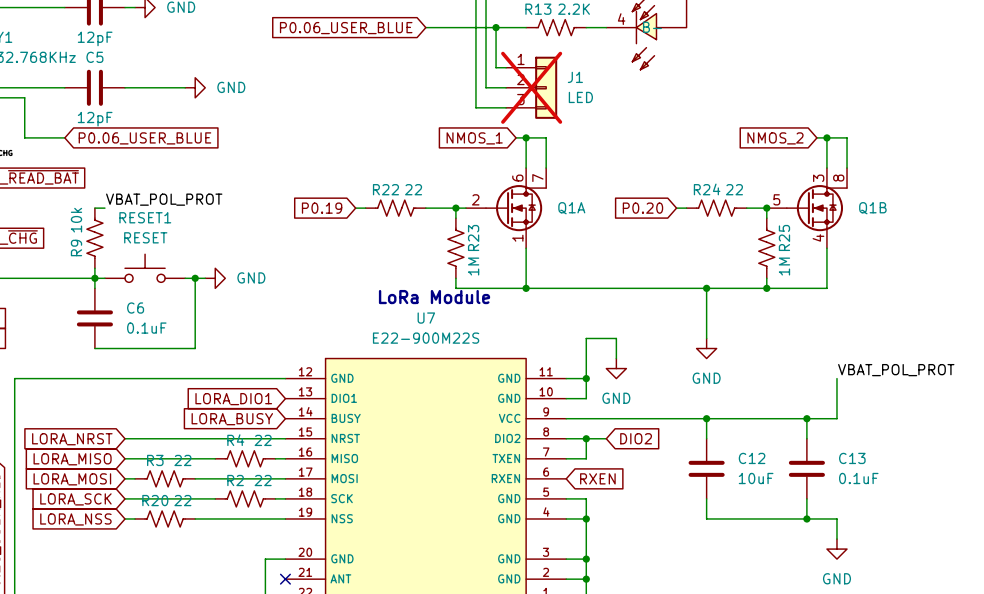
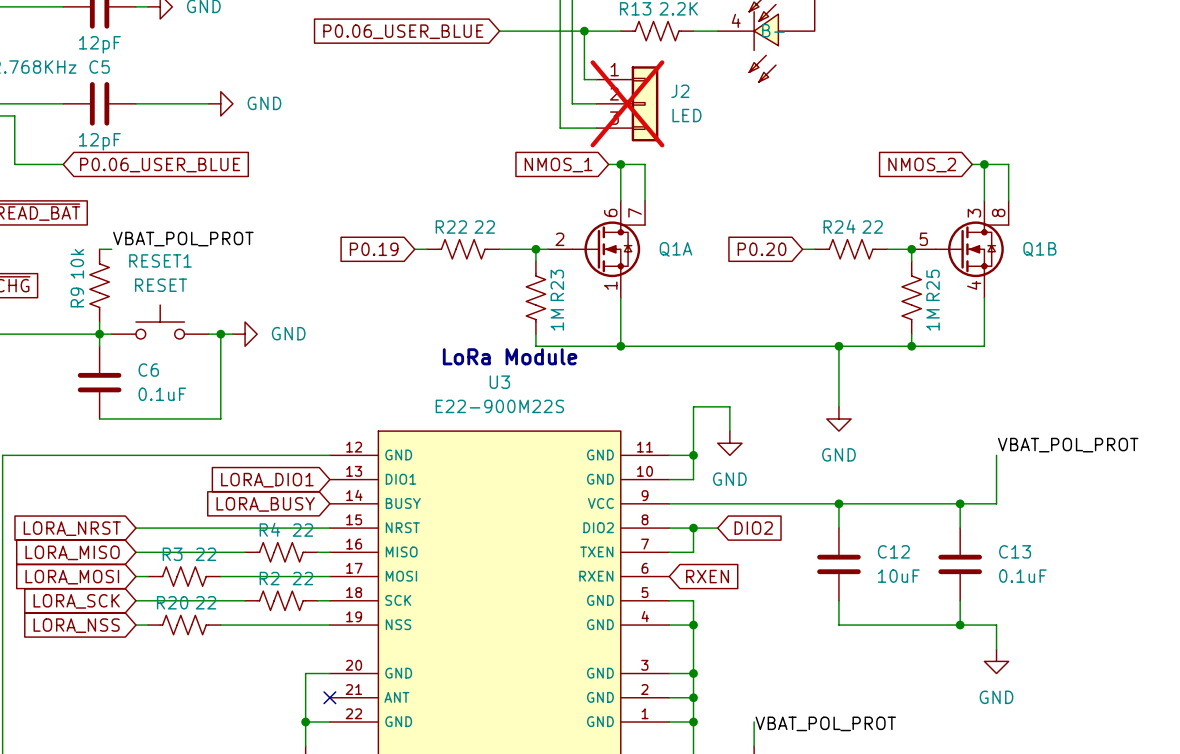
J1 name: J1 (575, 77) -> J2 (680, 91)
U7 name: U7 (426, 318) -> U3 (499, 382)

